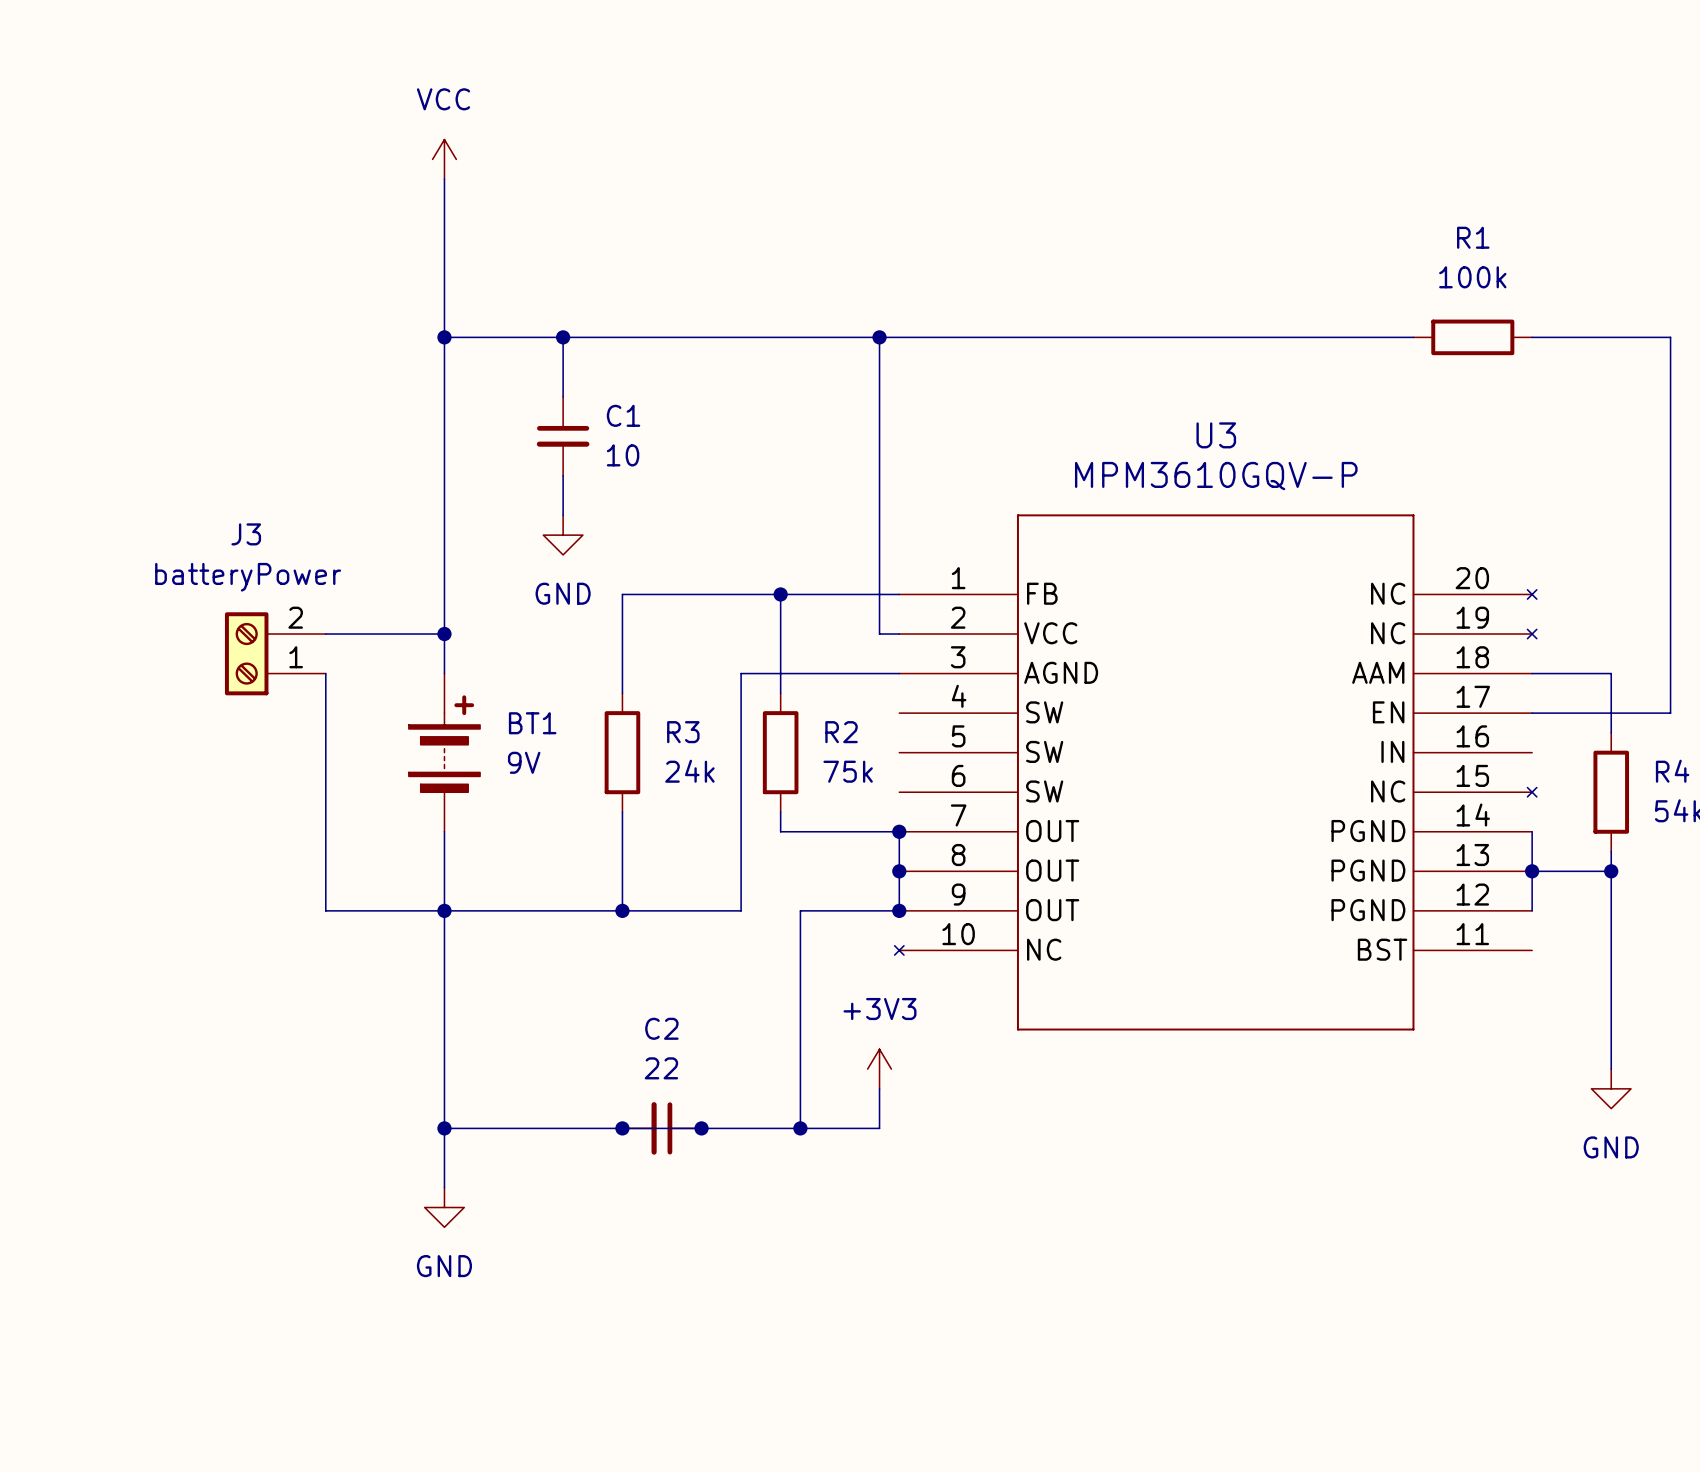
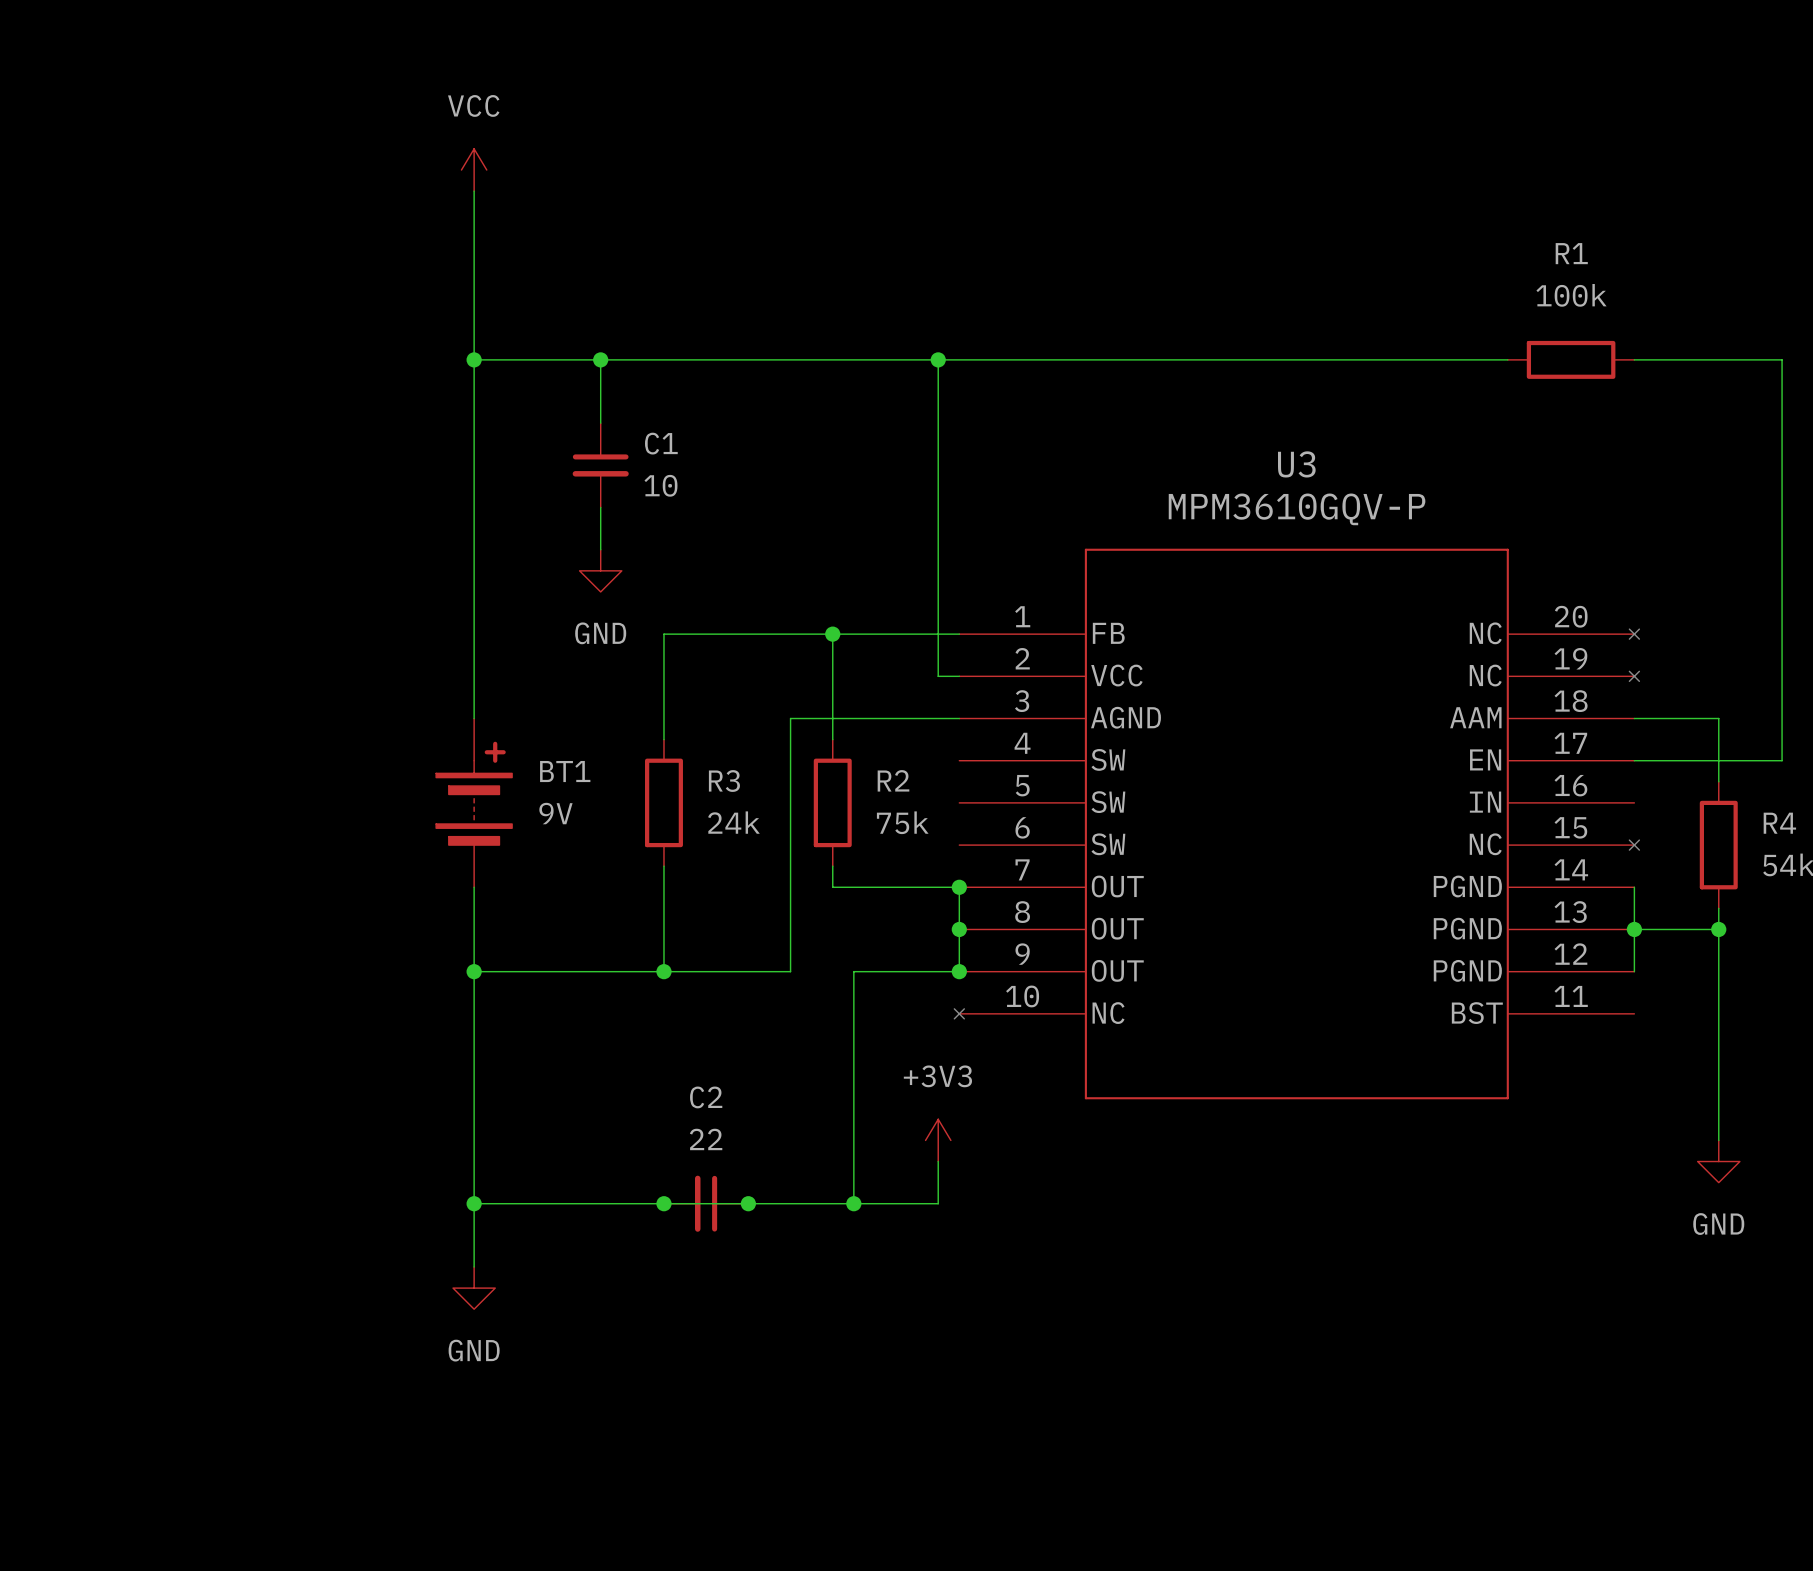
wire: (325, 634) (444, 634) -> none
junction: (444, 634) -> none
J3: batteryPower (275, 653) -> none
wire: (325, 673) (325, 910) (444, 910) -> none

